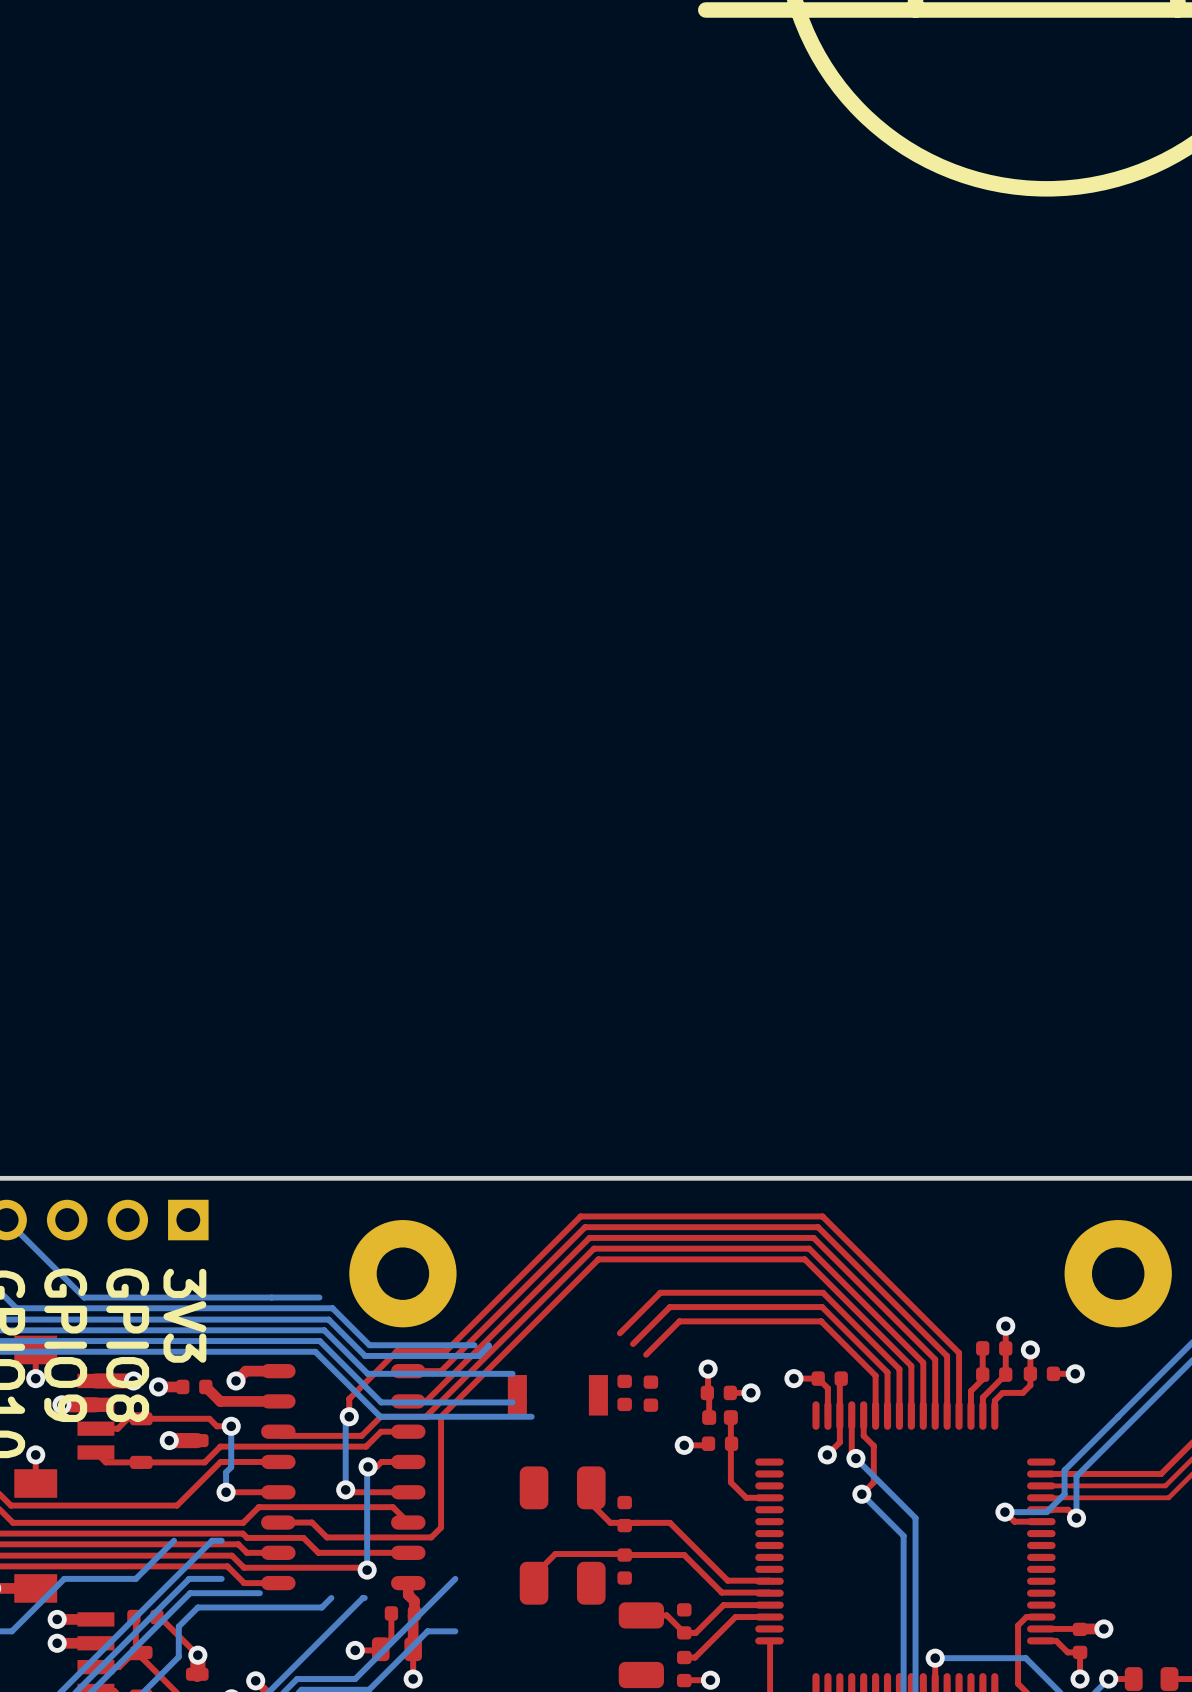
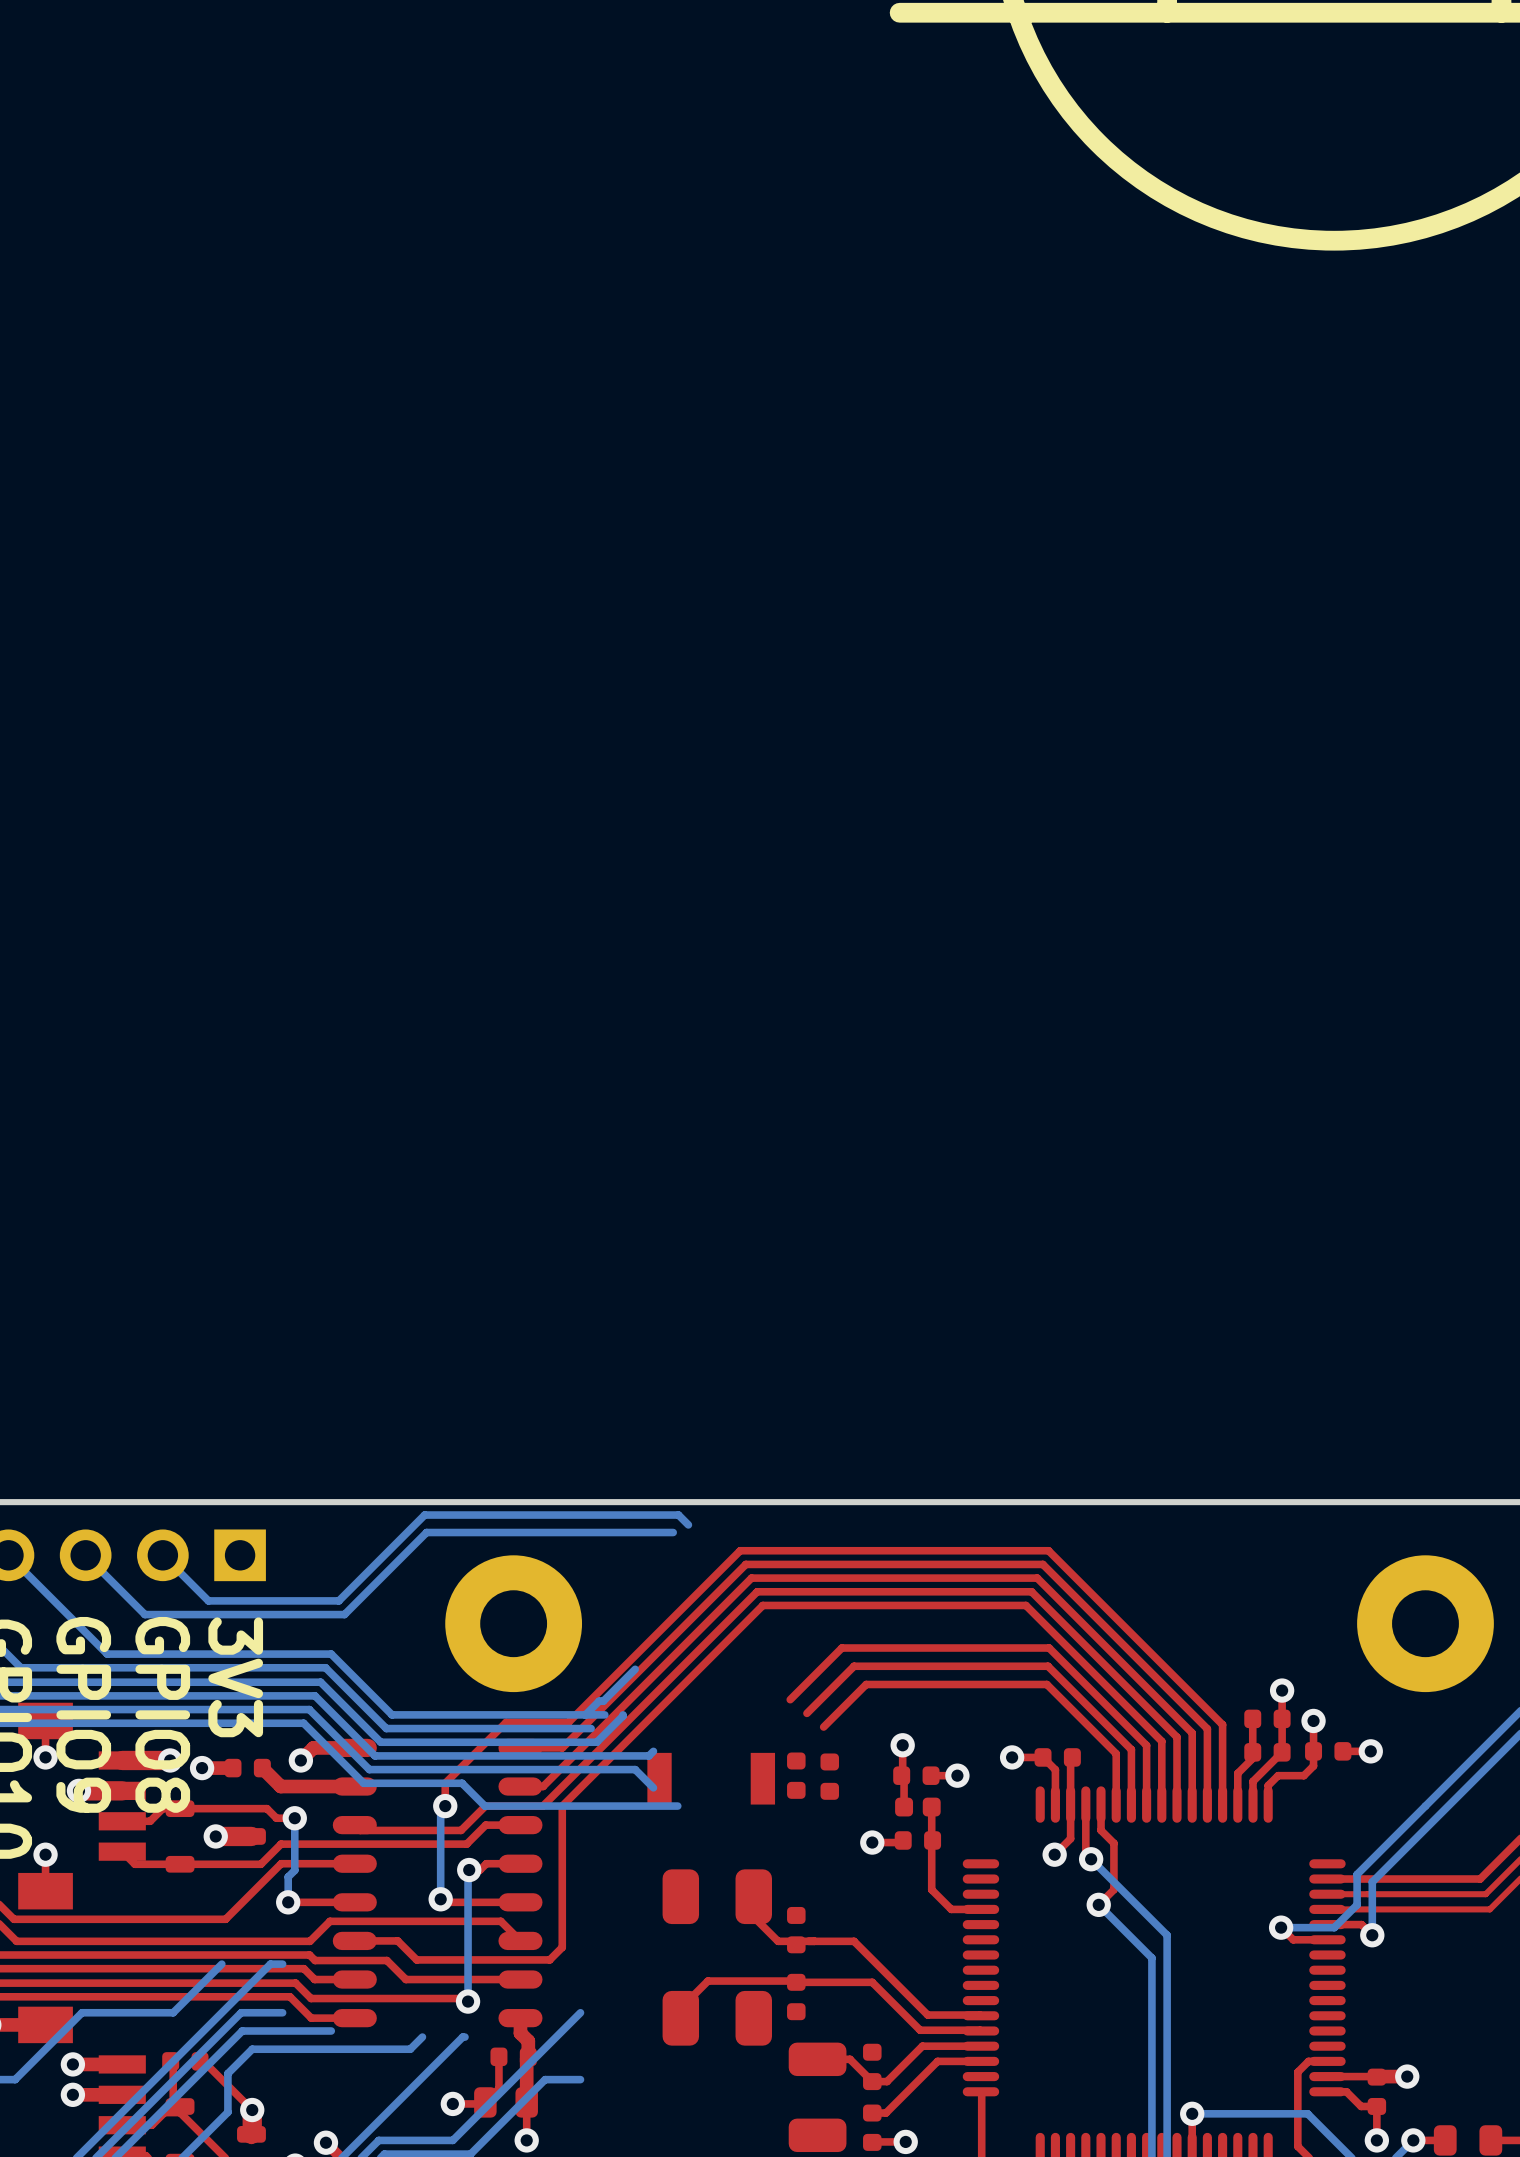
bottom track: none -> (688, 1524) (678, 1515) (424, 1515) (338, 1600) (208, 1600) (162, 1555)
bottom track: none -> (673, 1532) (426, 1532) (344, 1614) (144, 1614) (85, 1555)
bottom track: (319, 1297) (259, 1297) -> none
bottom track: (255, 1308) (332, 1308) (369, 1345) -> (331, 1654) (392, 1714) (471, 1714)
bottom track: none -> (635, 1669) (603, 1701) (599, 1701) (585, 1714)
bottom track: (251, 1319) (328, 1319) (365, 1355) -> (325, 1667) (386, 1728) (465, 1728)
bottom track: (247, 1330) (324, 1330) (367, 1373) (512, 1373) -> (315, 1695) (375, 1755) (648, 1755) (653, 1751)
bottom track: (242, 1341) (319, 1341) (381, 1402) (512, 1402) -> (309, 1709) (369, 1769) (635, 1769) (653, 1787)
bottom track: (238, 1351) (315, 1351) (362, 1398) -> (303, 1723) (363, 1783) (462, 1783)
bottom track: (478, 1355) (463, 1355) -> (610, 1728) (596, 1742) (380, 1742) (320, 1682)

